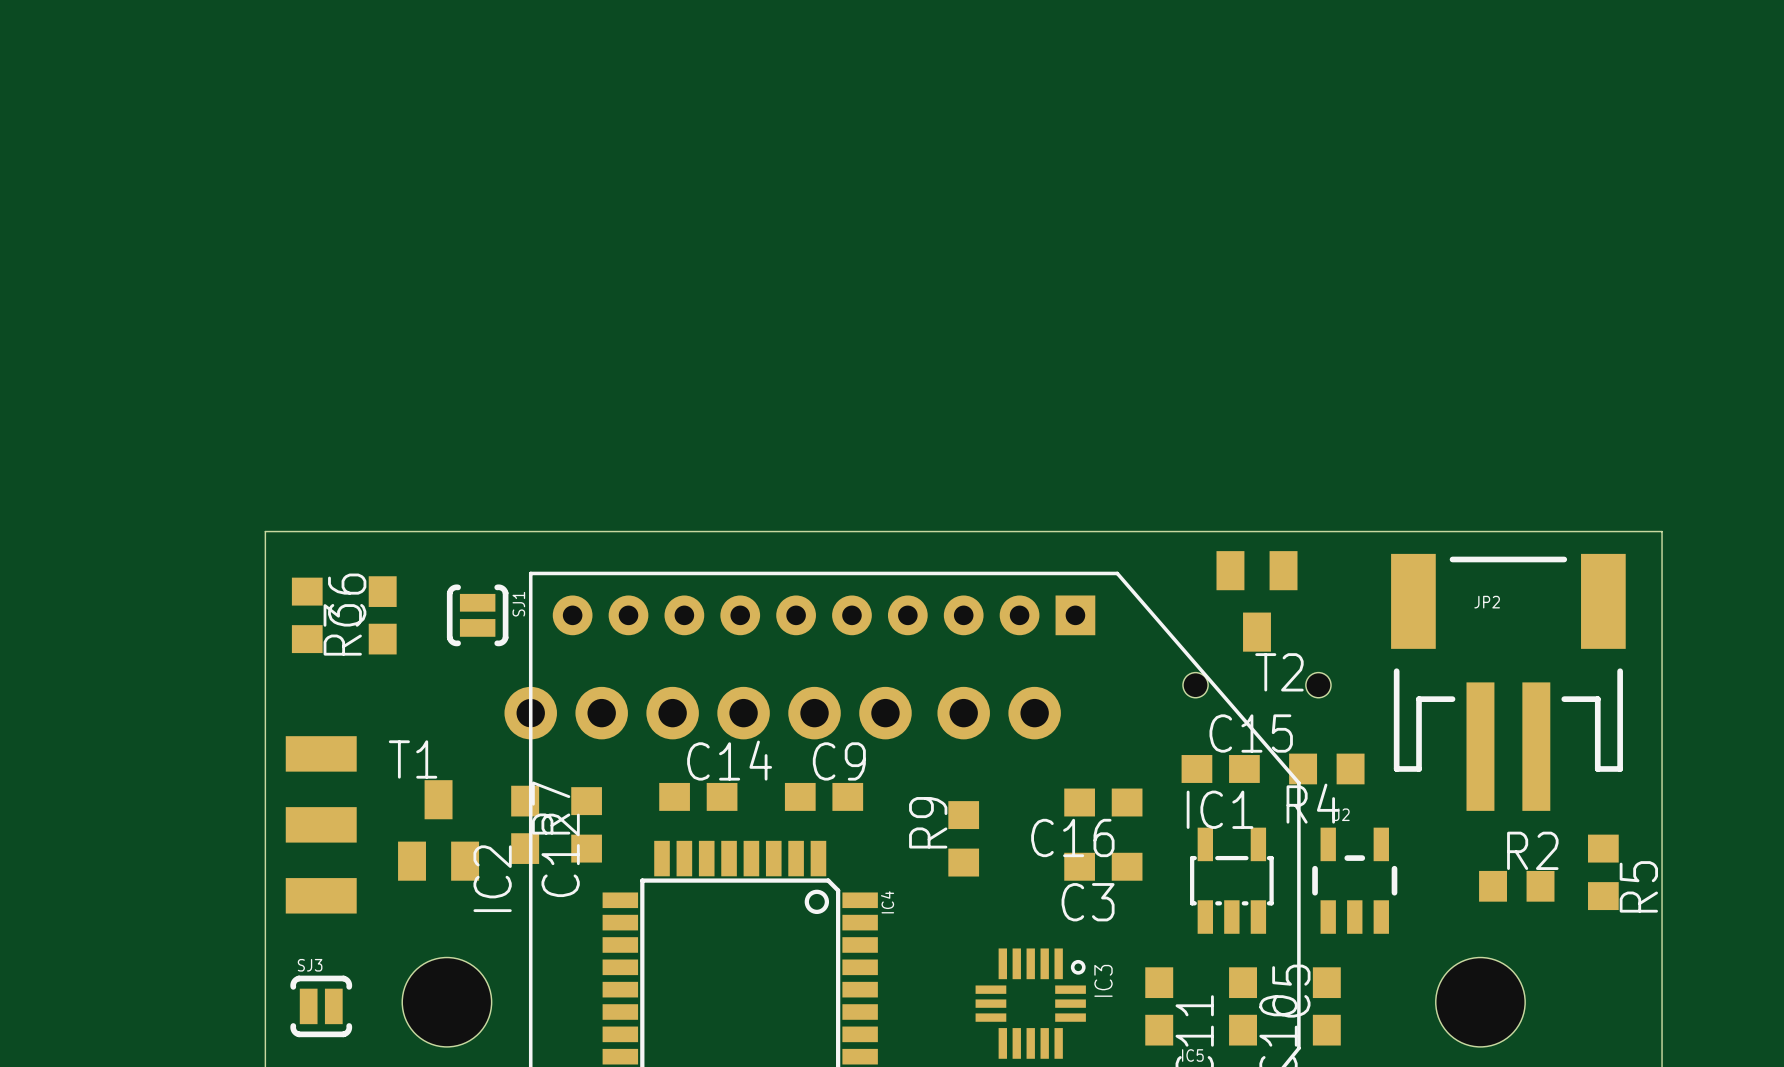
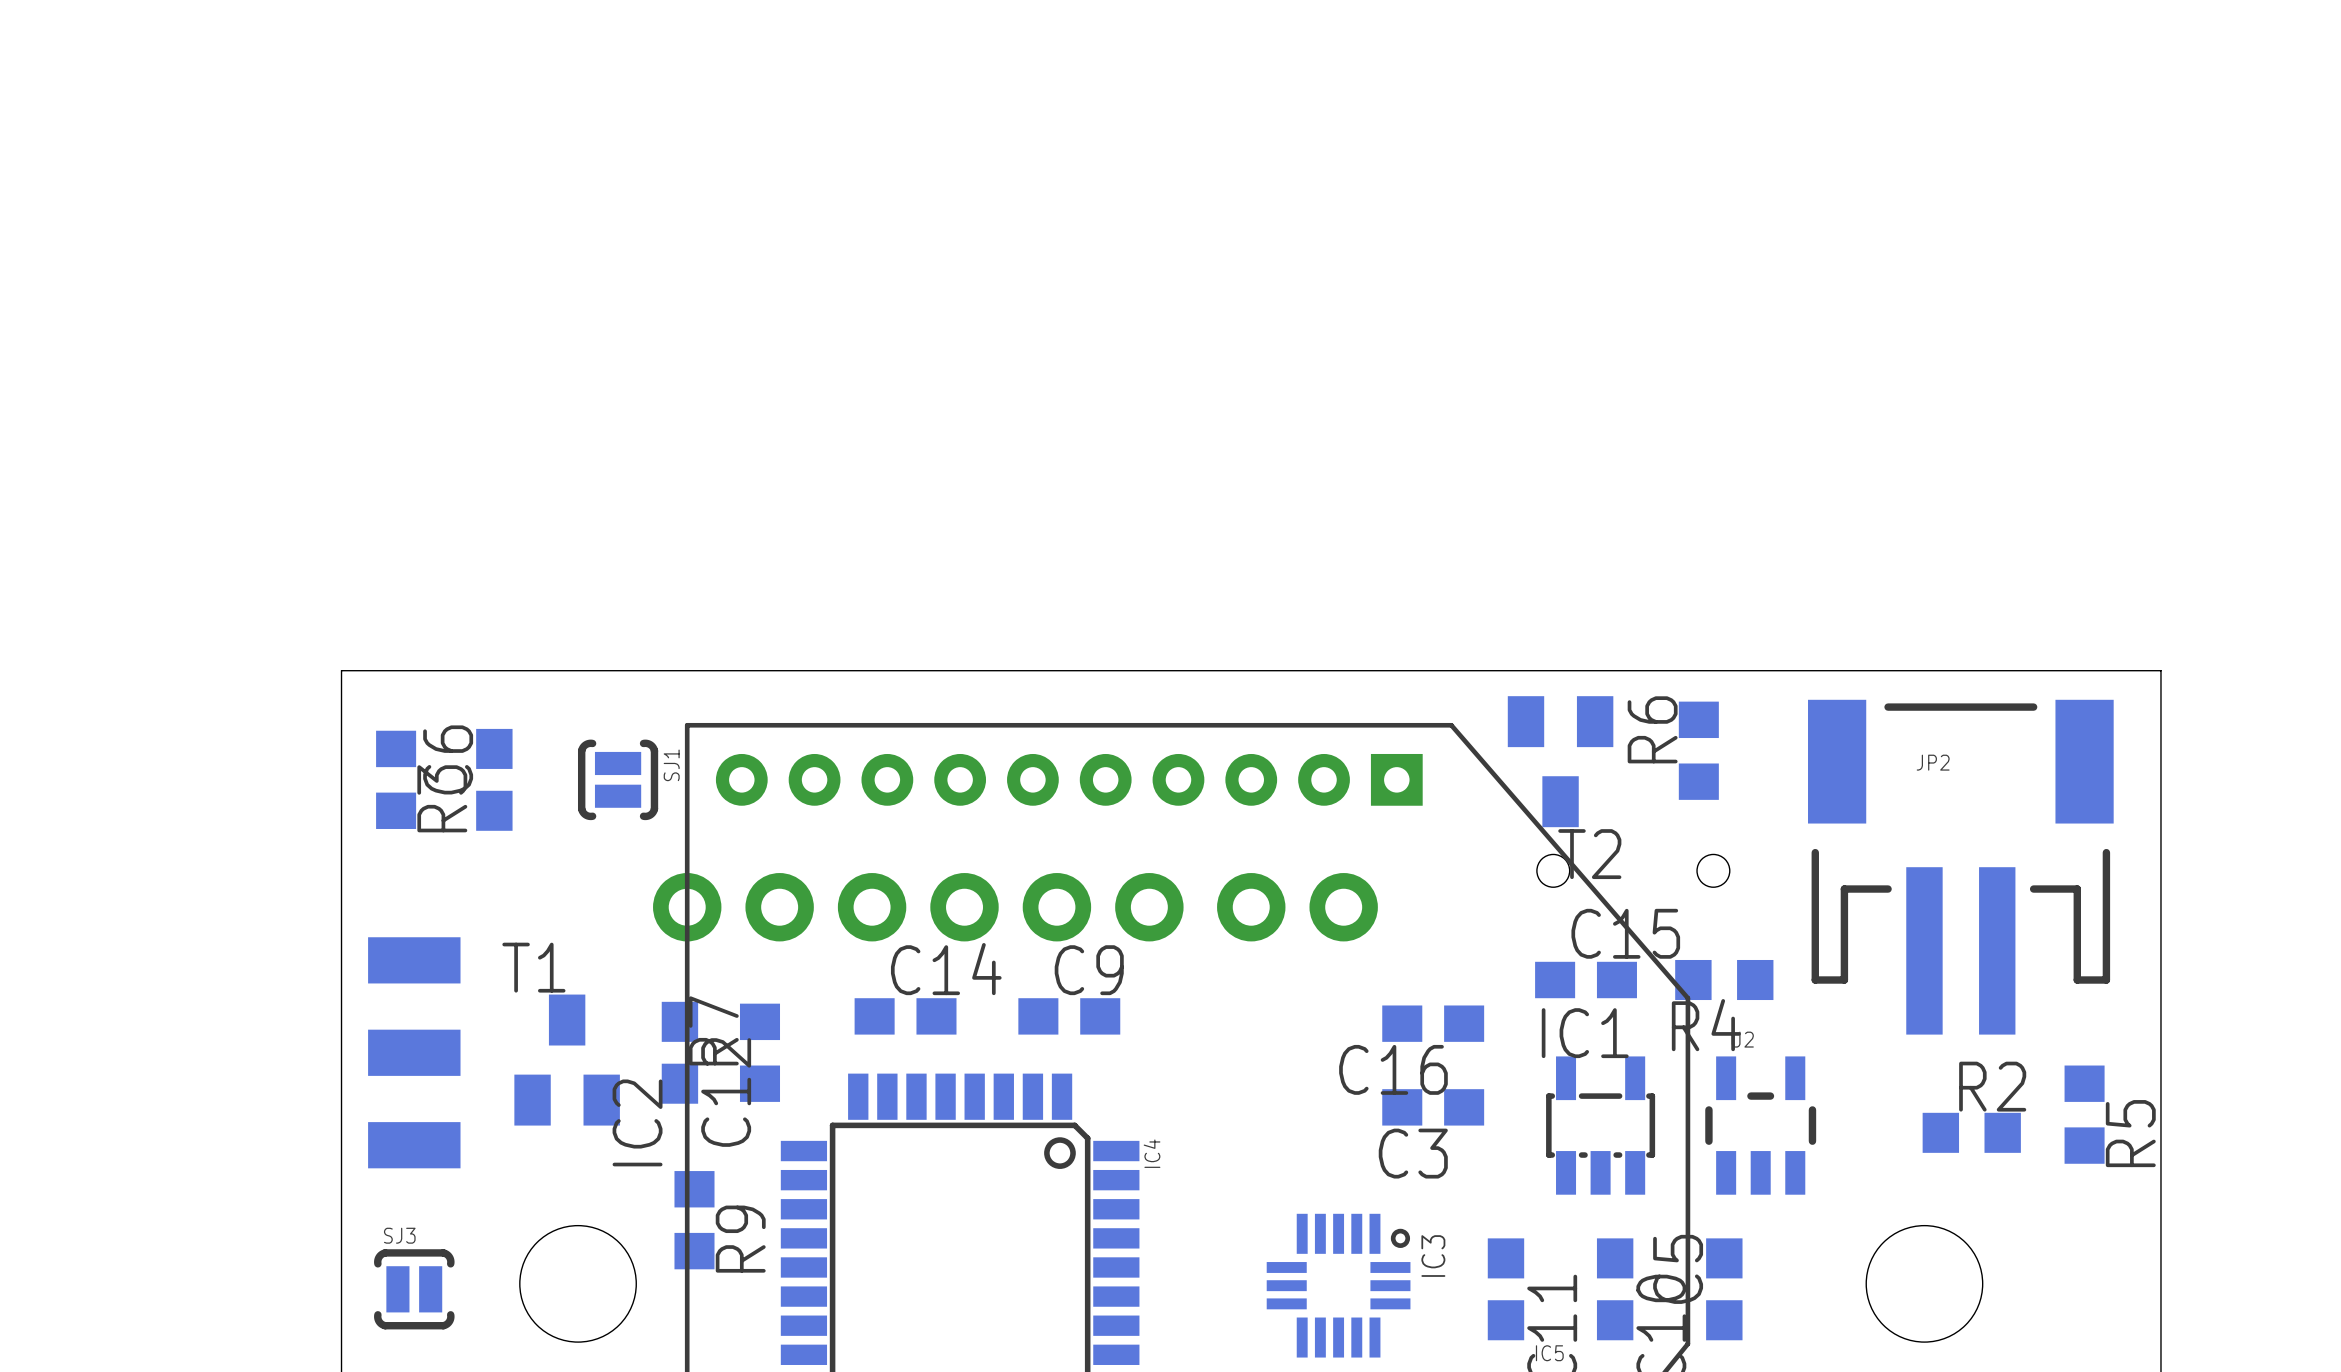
R6: none -> (1698, 750)
T2 position: (1256, 601) -> (1560, 761)
R9 name position: R9 (928, 822) -> R9 (740, 1239)
R9 position: (963, 838) -> (694, 1220)

